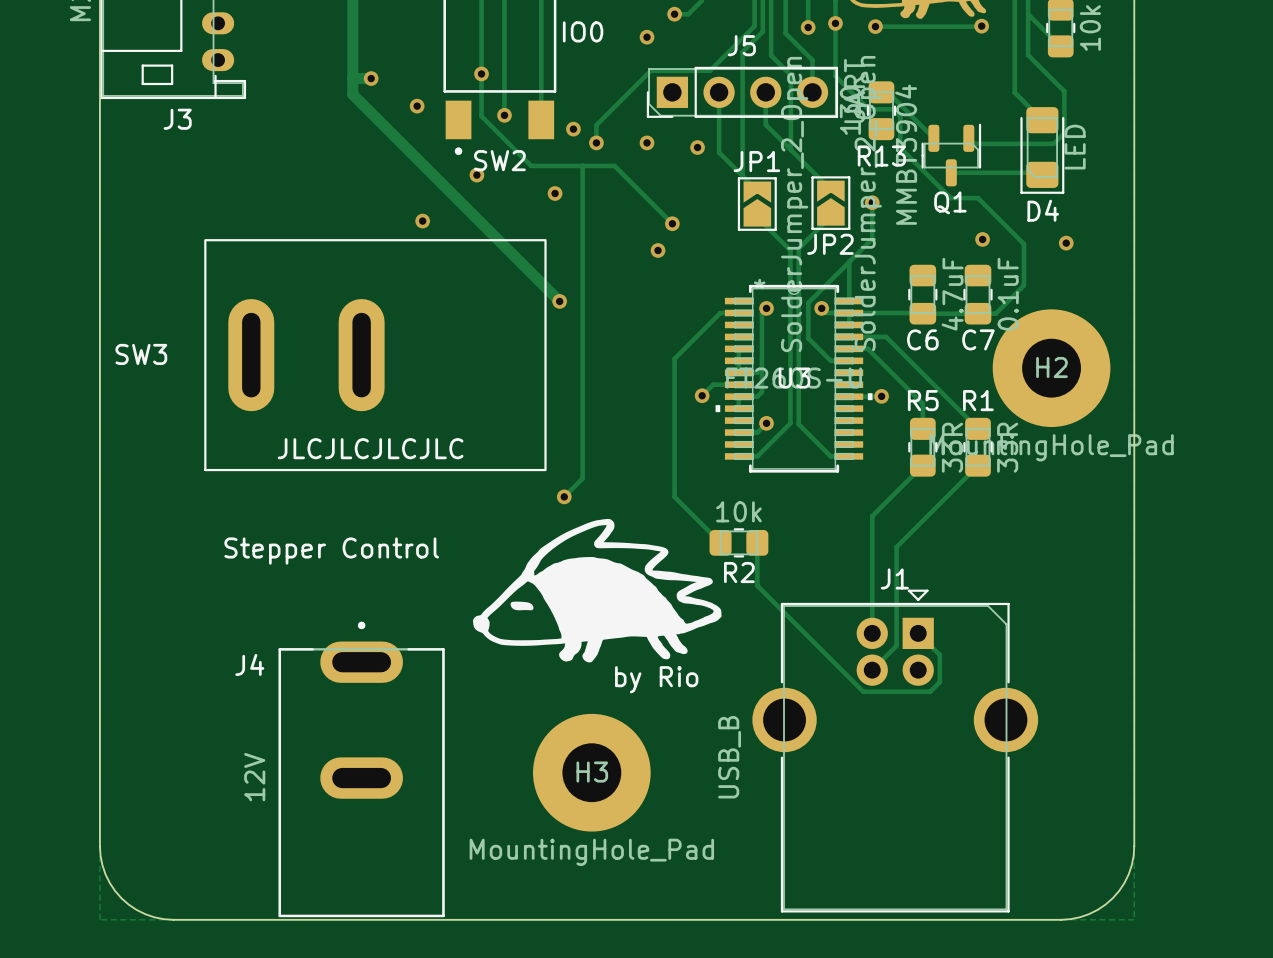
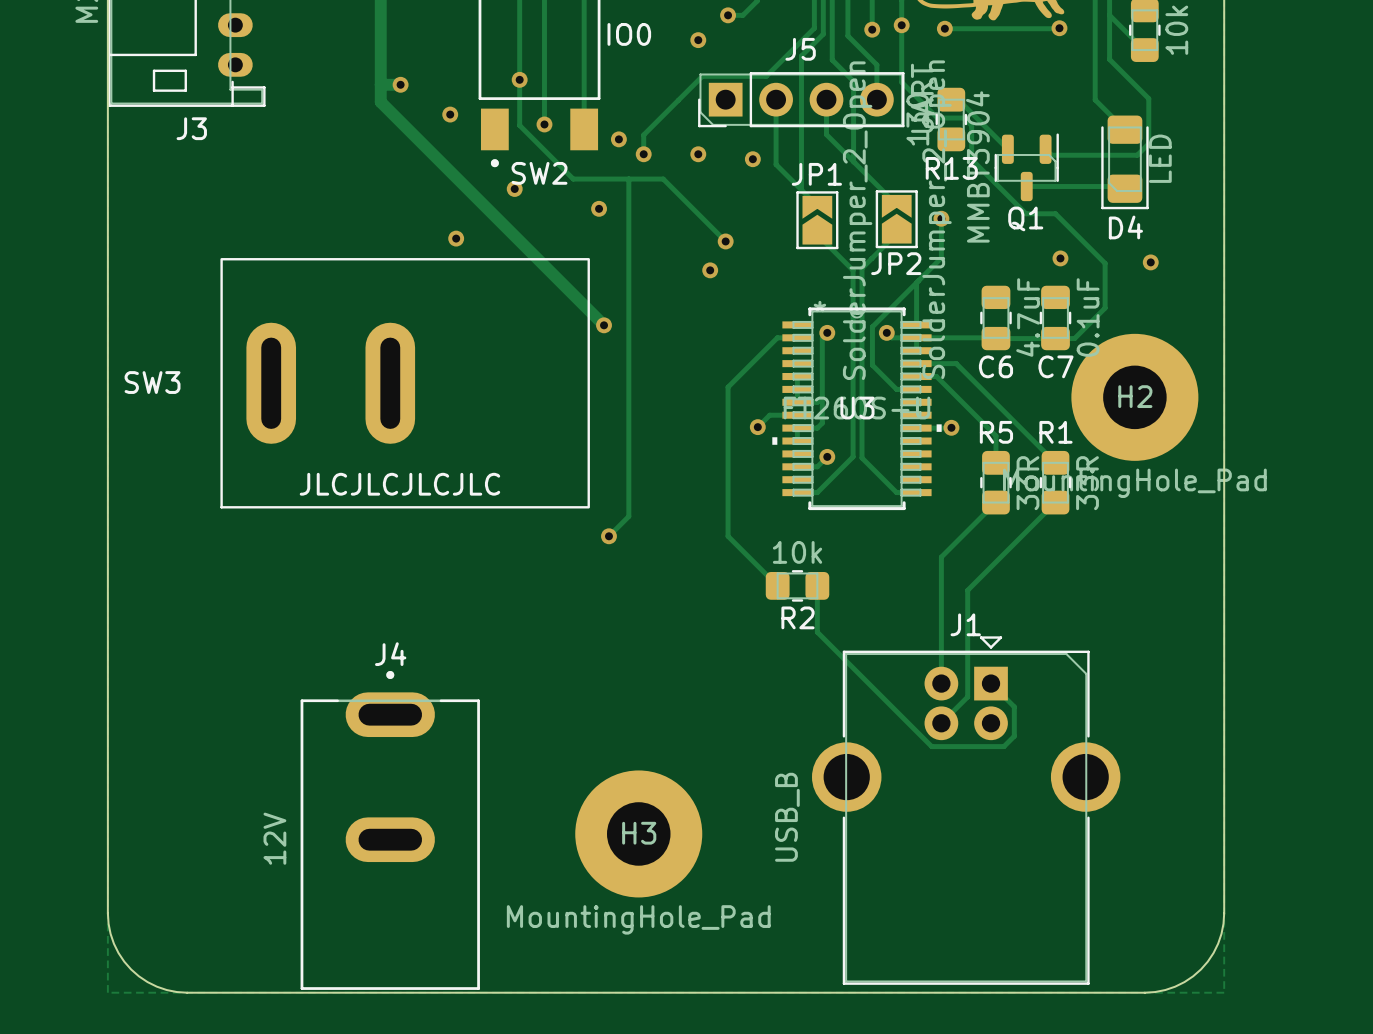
drawing: [472, 518, 722, 663] -> none
text: Stepper Control (331, 551) -> none
J4 name position: J4 (249, 664) -> J4 (390, 654)
text: by Rio (656, 679) -> none

